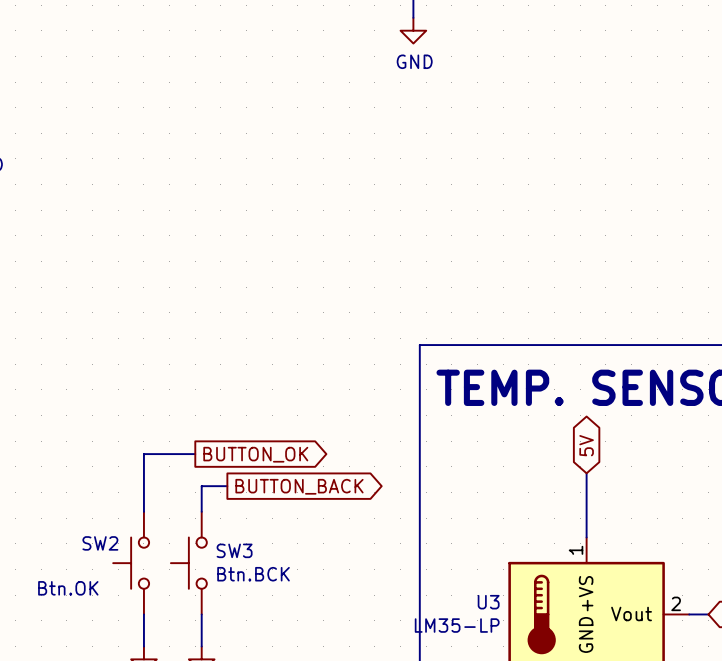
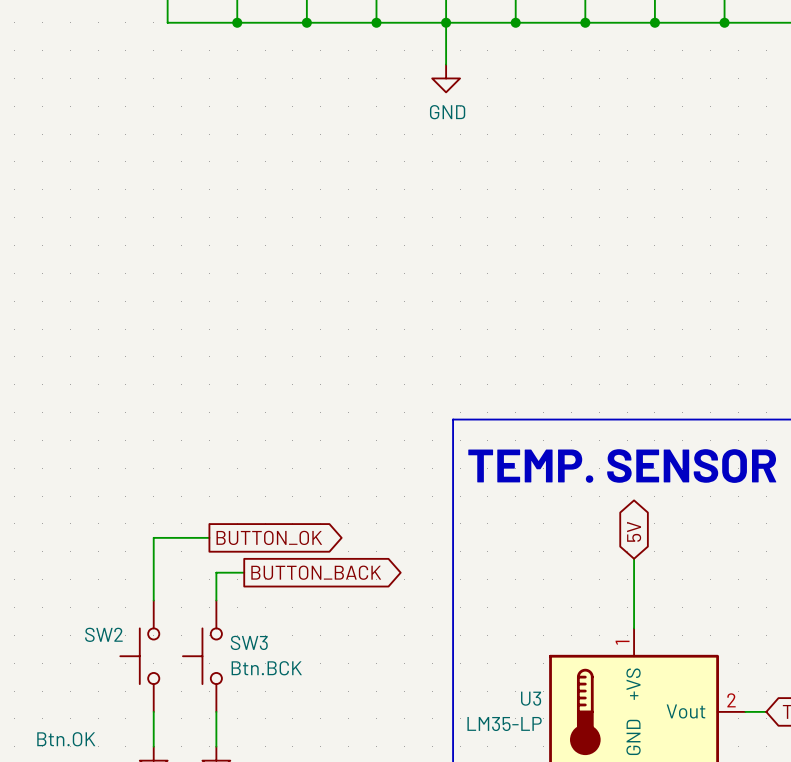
SW2 value position: Btn.OK (68, 588) -> Btn.OK (66, 739)

